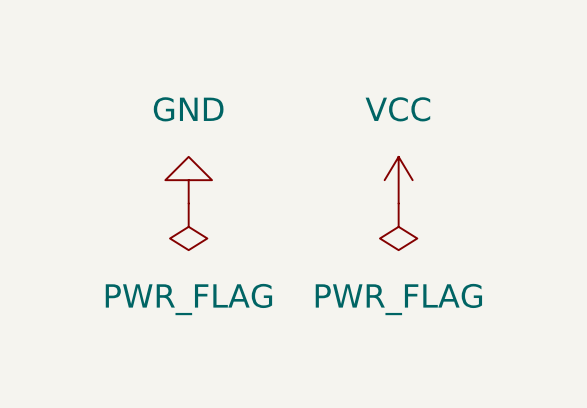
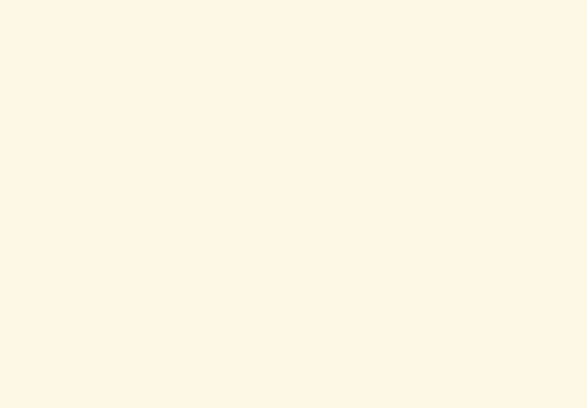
power symbol: GND (188, 180) -> none
power symbol: VCC (398, 180) -> none
power symbol: PWR_FLAG (188, 226) -> none
power symbol: PWR_FLAG (398, 226) -> none

